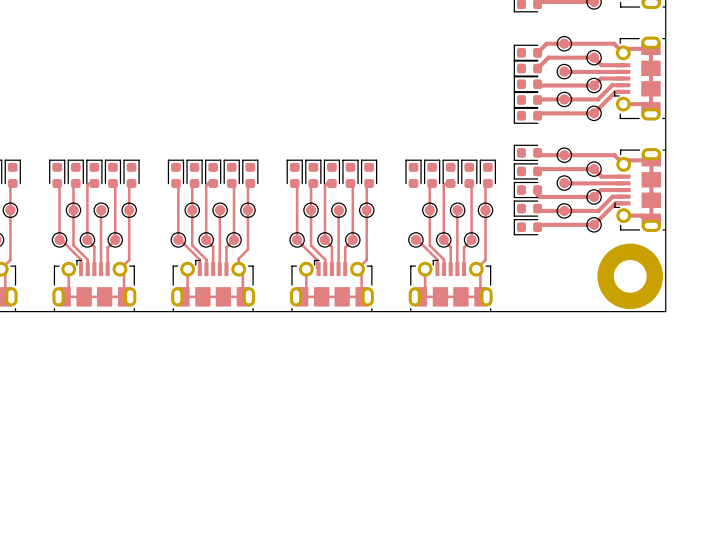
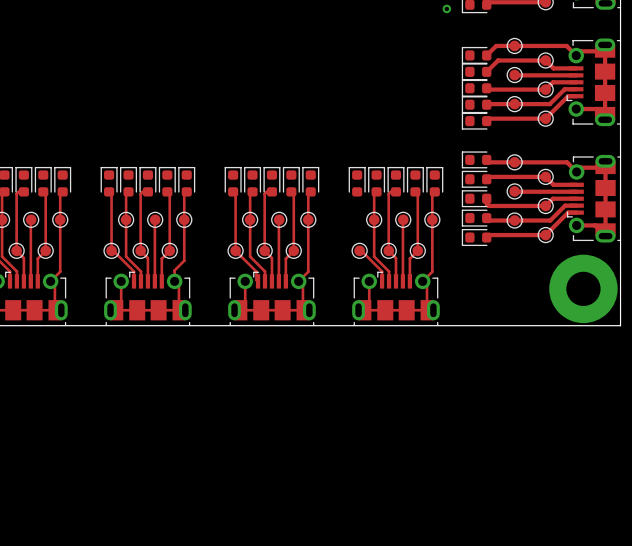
via: none -> (446, 8)

